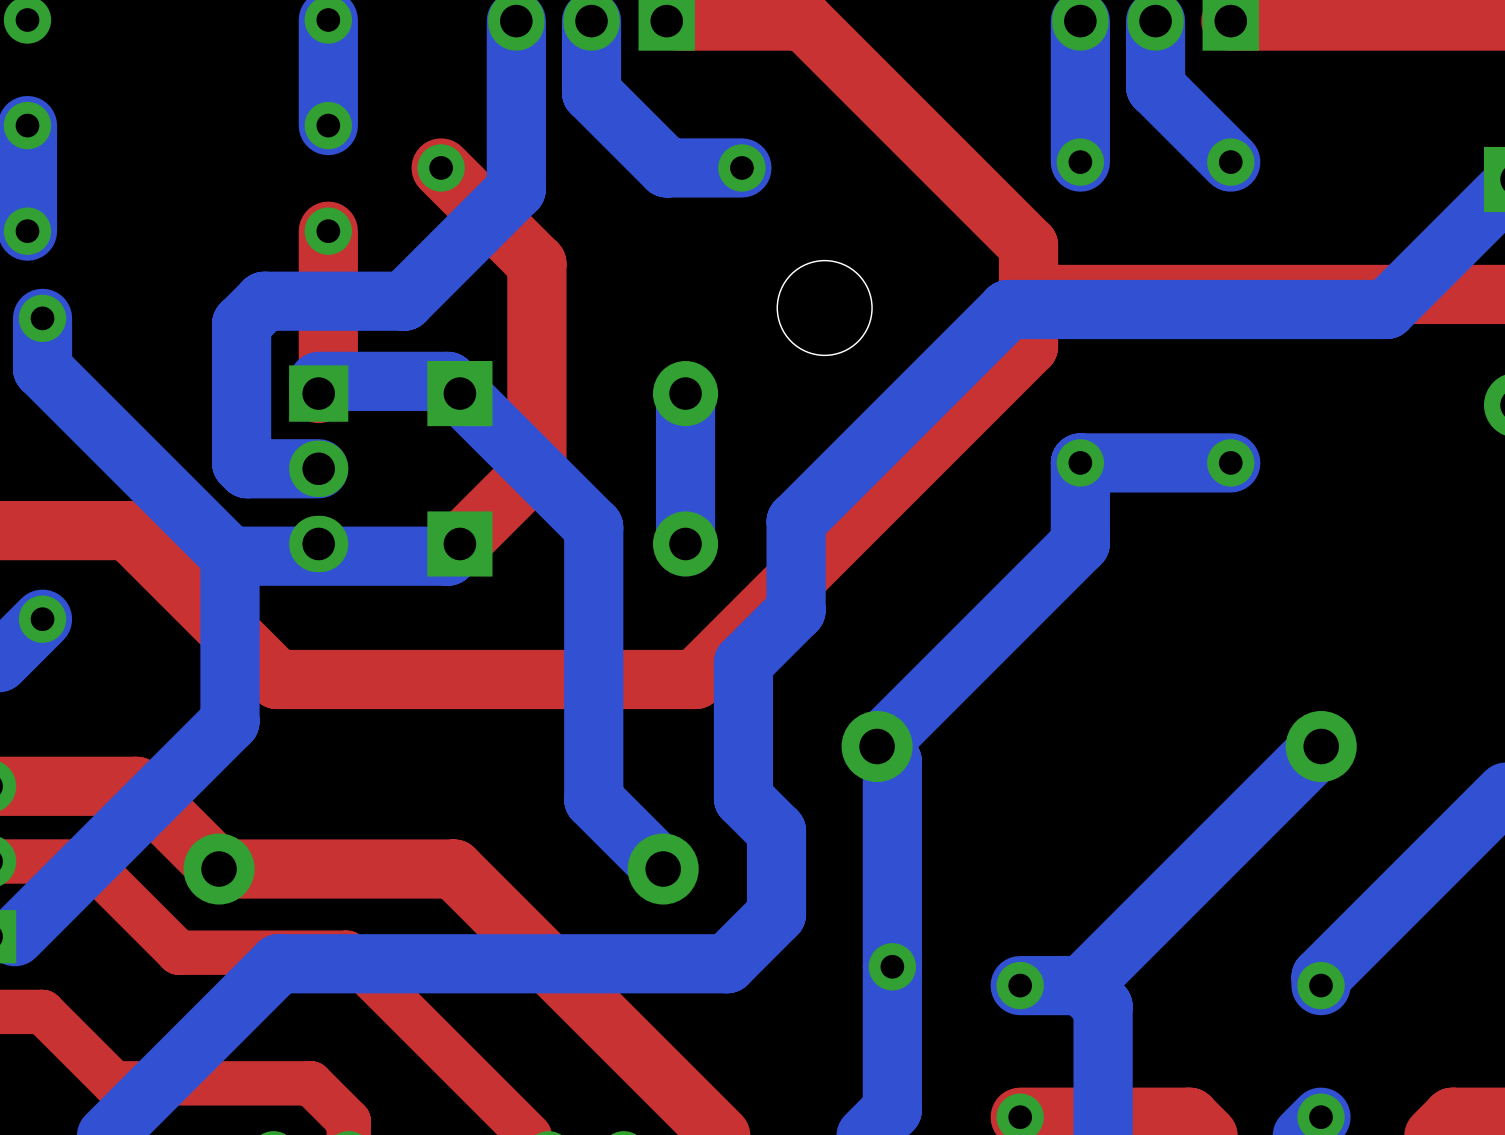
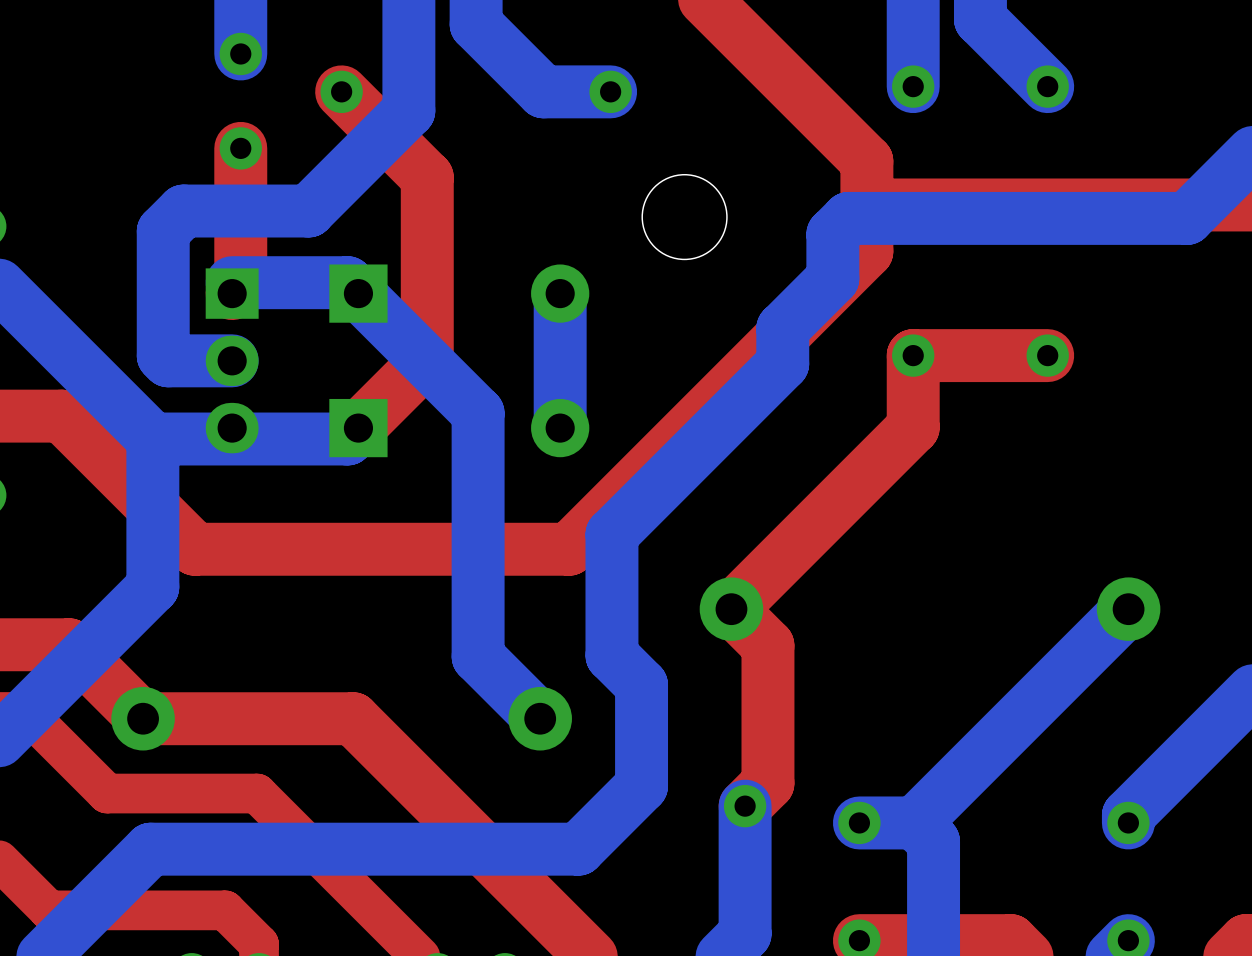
bottom track: (990, 327) (796, 521) (796, 610) -> (832, 234) (832, 278) (782, 328) (782, 363) (659, 487)
bottom track: (1230, 462) (1080, 462) (1080, 543) (877, 746) (892, 761) (892, 966) -> none
top track: none -> (1047, 355) (913, 355) (913, 427) (731, 609) (767, 645) (767, 783) (745, 806)
bottom track: (776, 914) (726, 963) (278, 963) (227, 1014) -> (641, 759) (641, 785) (578, 849) (150, 849)

